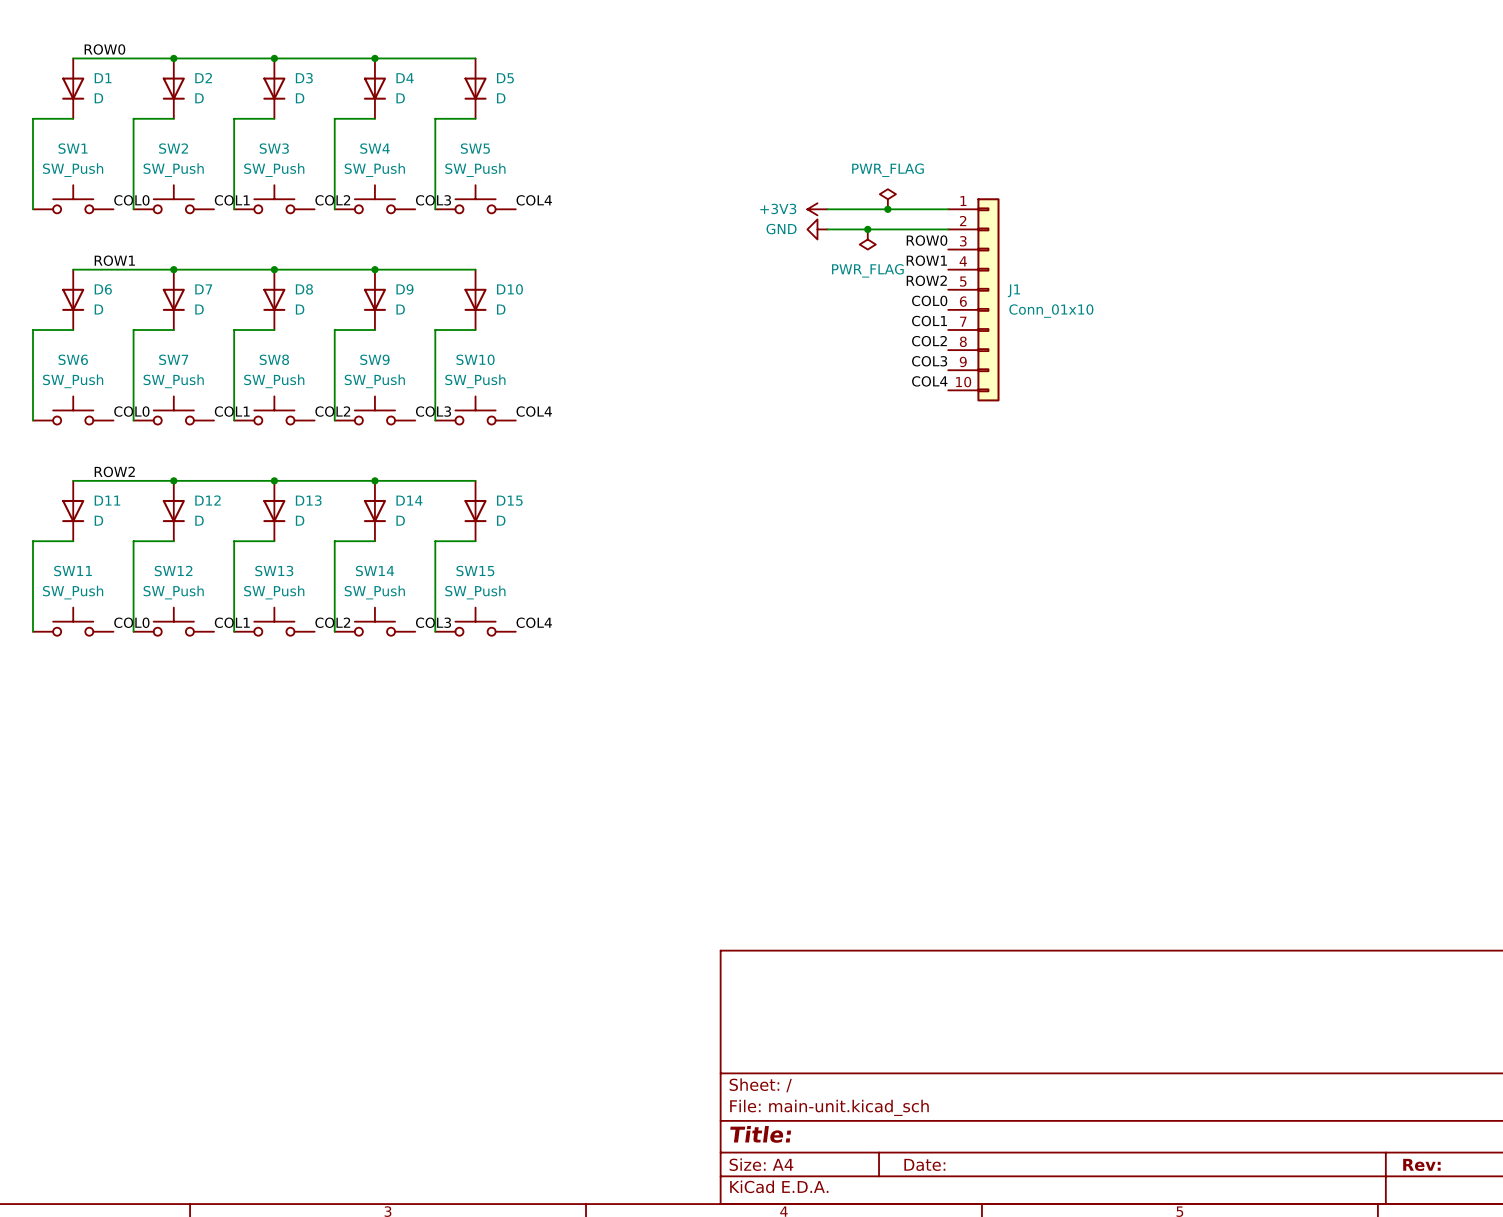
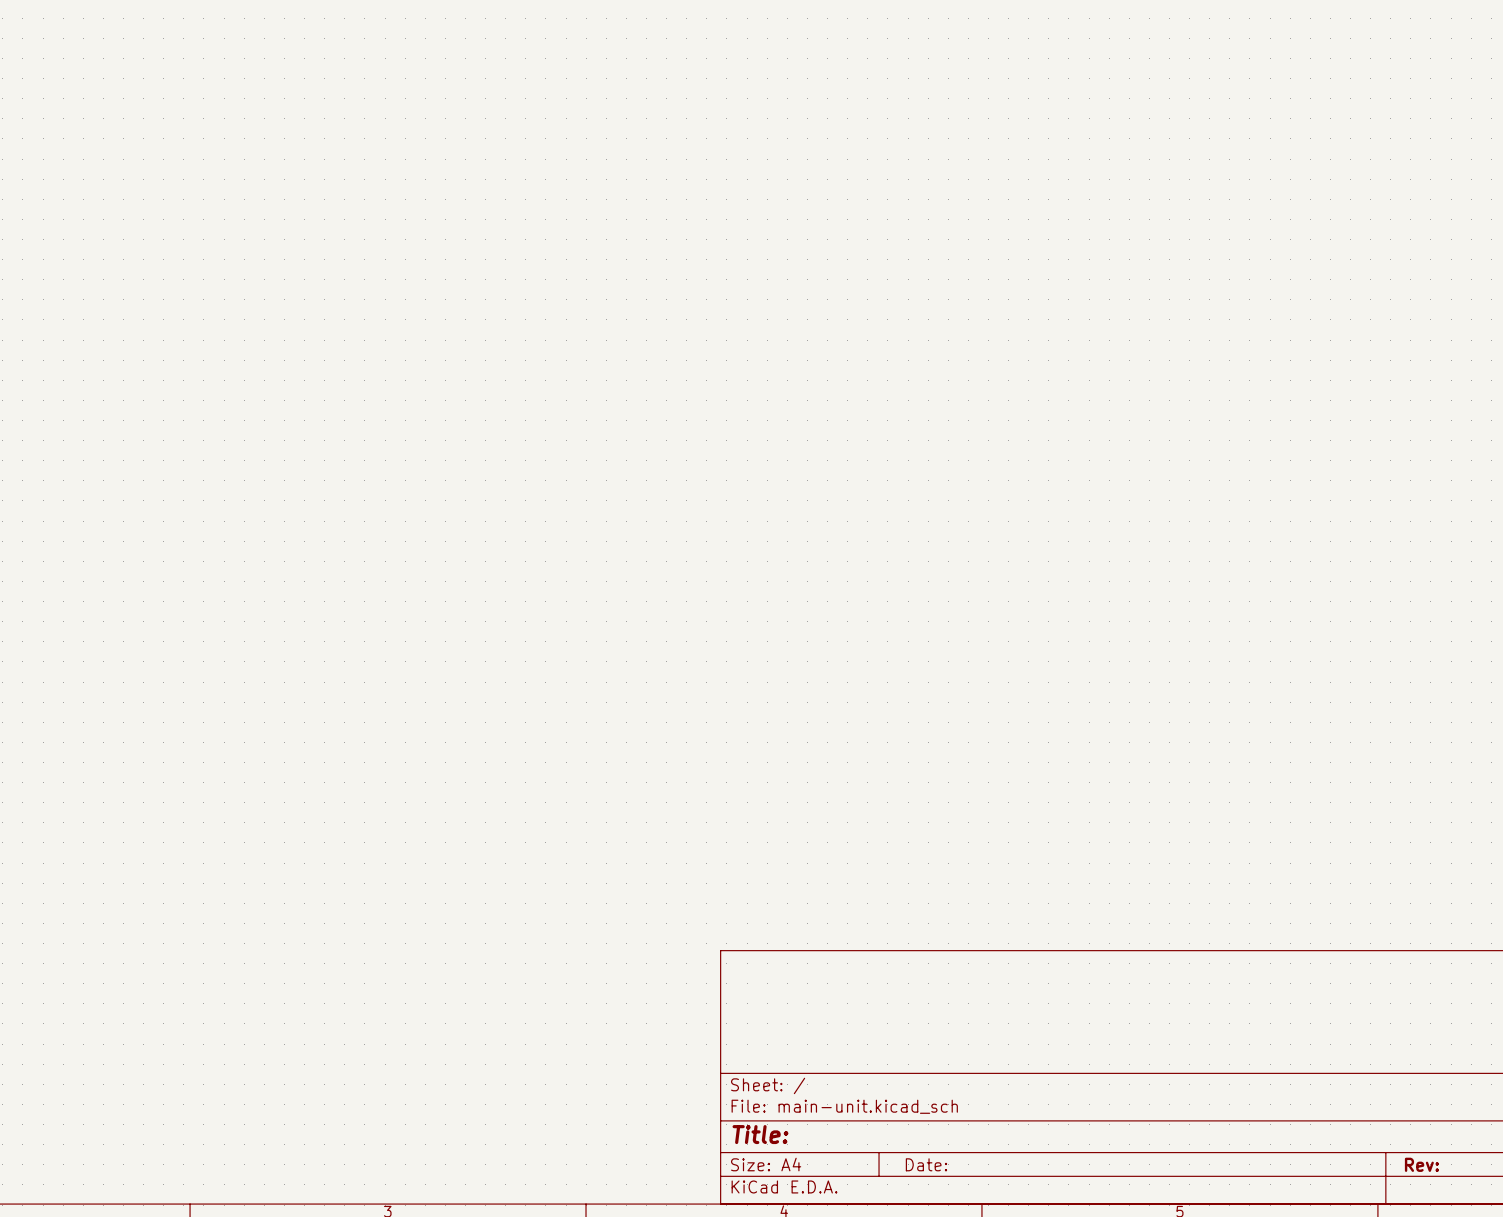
label: ROW0 (104, 49) -> none
wire: (73, 58) (475, 58) -> none
junction: (173, 58) -> none
junction: (274, 58) -> none
junction: (374, 58) -> none
D1: D (73, 88) -> none
D2: D (173, 88) -> none
D3: D (274, 88) -> none
D4: D (374, 88) -> none
D5: D (475, 88) -> none
wire: (73, 118) (33, 118) (33, 209) -> none
wire: (173, 118) (133, 118) (133, 209) -> none
wire: (274, 118) (234, 118) (234, 209) -> none
wire: (374, 118) (334, 118) (334, 209) -> none
wire: (475, 118) (435, 118) (435, 209) -> none
SW1: SW_Push (73, 199) -> none
SW2: SW_Push (173, 199) -> none
SW3: SW_Push (274, 199) -> none
SW4: SW_Push (374, 199) -> none
SW5: SW_Push (475, 199) -> none
power symbol: PWR_FLAG (887, 199) -> none
label: COL0 (131, 200) -> none
label: COL1 (232, 200) -> none
label: COL2 (332, 200) -> none
label: COL3 (433, 200) -> none
label: COL4 (534, 200) -> none
power symbol: +3V3 (817, 209) -> none
wire: (827, 209) (948, 209) -> none
junction: (887, 209) -> none
power symbol: GND (817, 229) -> none
wire: (827, 229) (948, 229) -> none
junction: (867, 229) -> none
power symbol: PWR_FLAG (867, 239) -> none
label: ROW0 (927, 240) -> none
label: ROW1 (114, 260) -> none
label: ROW1 (926, 260) -> none
wire: (73, 269) (475, 269) -> none
junction: (173, 269) -> none
junction: (274, 269) -> none
junction: (374, 269) -> none
label: ROW2 (926, 280) -> none
D6: D (73, 299) -> none
D7: D (173, 299) -> none
D8: D (274, 299) -> none
D9: D (374, 299) -> none
D10: D (475, 299) -> none
J1: Conn_01x10 (973, 299) -> none
label: COL0 (929, 300) -> none
label: COL1 (929, 321) -> none
wire: (73, 330) (33, 330) (33, 420) -> none
wire: (173, 330) (133, 330) (133, 420) -> none
wire: (274, 330) (234, 330) (234, 420) -> none
wire: (374, 330) (334, 330) (334, 420) -> none
wire: (475, 330) (435, 330) (435, 420) -> none
label: COL2 (929, 341) -> none
label: COL3 (929, 361) -> none
label: COL4 (929, 381) -> none
SW6: SW_Push (73, 410) -> none
SW7: SW_Push (173, 410) -> none
SW8: SW_Push (274, 410) -> none
SW9: SW_Push (374, 410) -> none
SW10: SW_Push (475, 410) -> none
label: COL0 (131, 411) -> none
label: COL1 (232, 411) -> none
label: COL2 (332, 411) -> none
label: COL3 (433, 411) -> none
label: COL4 (534, 411) -> none
label: ROW2 (114, 471) -> none
wire: (73, 480) (475, 480) -> none
junction: (173, 480) -> none
junction: (274, 480) -> none
junction: (374, 480) -> none
D11: D (73, 511) -> none
D12: D (173, 511) -> none
D13: D (274, 511) -> none
D14: D (374, 511) -> none
D15: D (475, 511) -> none
wire: (73, 541) (33, 541) (33, 631) -> none
wire: (173, 541) (133, 541) (133, 631) -> none
wire: (274, 541) (234, 541) (234, 631) -> none
wire: (374, 541) (334, 541) (334, 631) -> none
wire: (475, 541) (435, 541) (435, 631) -> none
SW11: SW_Push (73, 621) -> none
SW12: SW_Push (173, 621) -> none
SW13: SW_Push (274, 621) -> none
SW14: SW_Push (374, 621) -> none
SW15: SW_Push (475, 621) -> none
label: COL0 (131, 622) -> none
label: COL1 (232, 622) -> none
label: COL2 (332, 622) -> none
label: COL3 (433, 622) -> none
label: COL4 (534, 622) -> none

